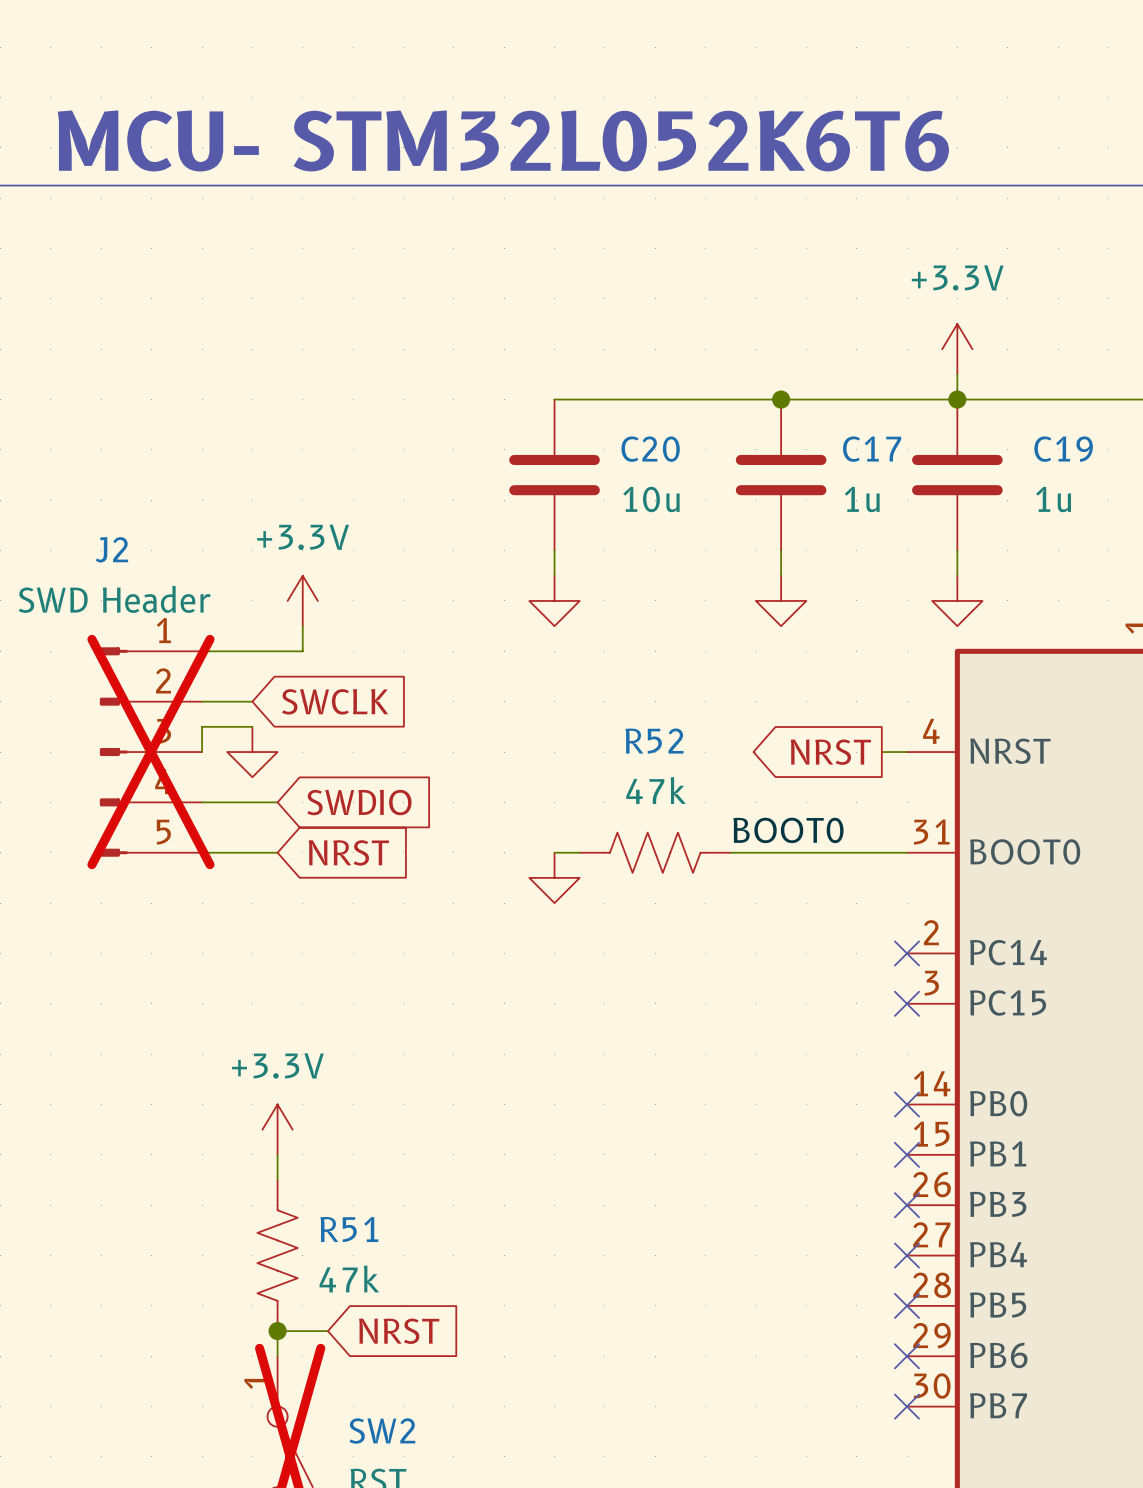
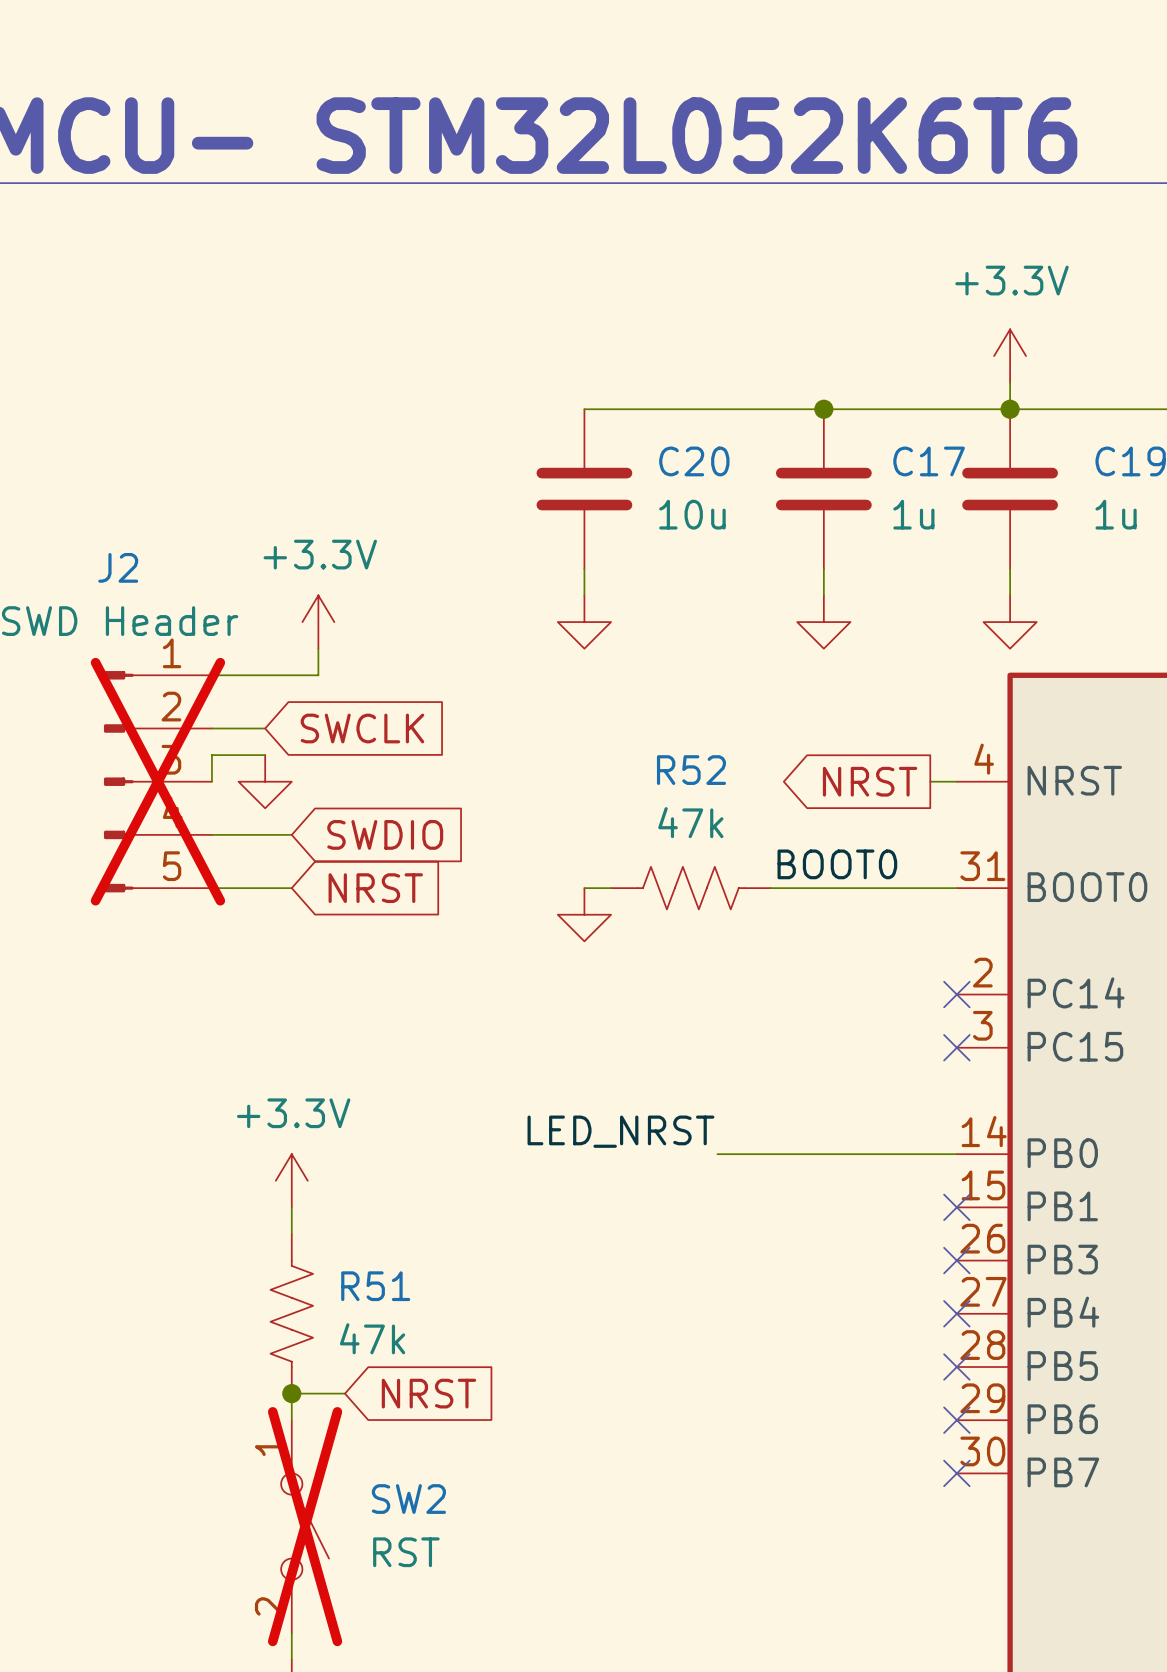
label: none -> LED_NRST (620, 1131)
wire: none -> (717, 1154) (956, 1154)
no-connect mark: (907, 1104) -> none

